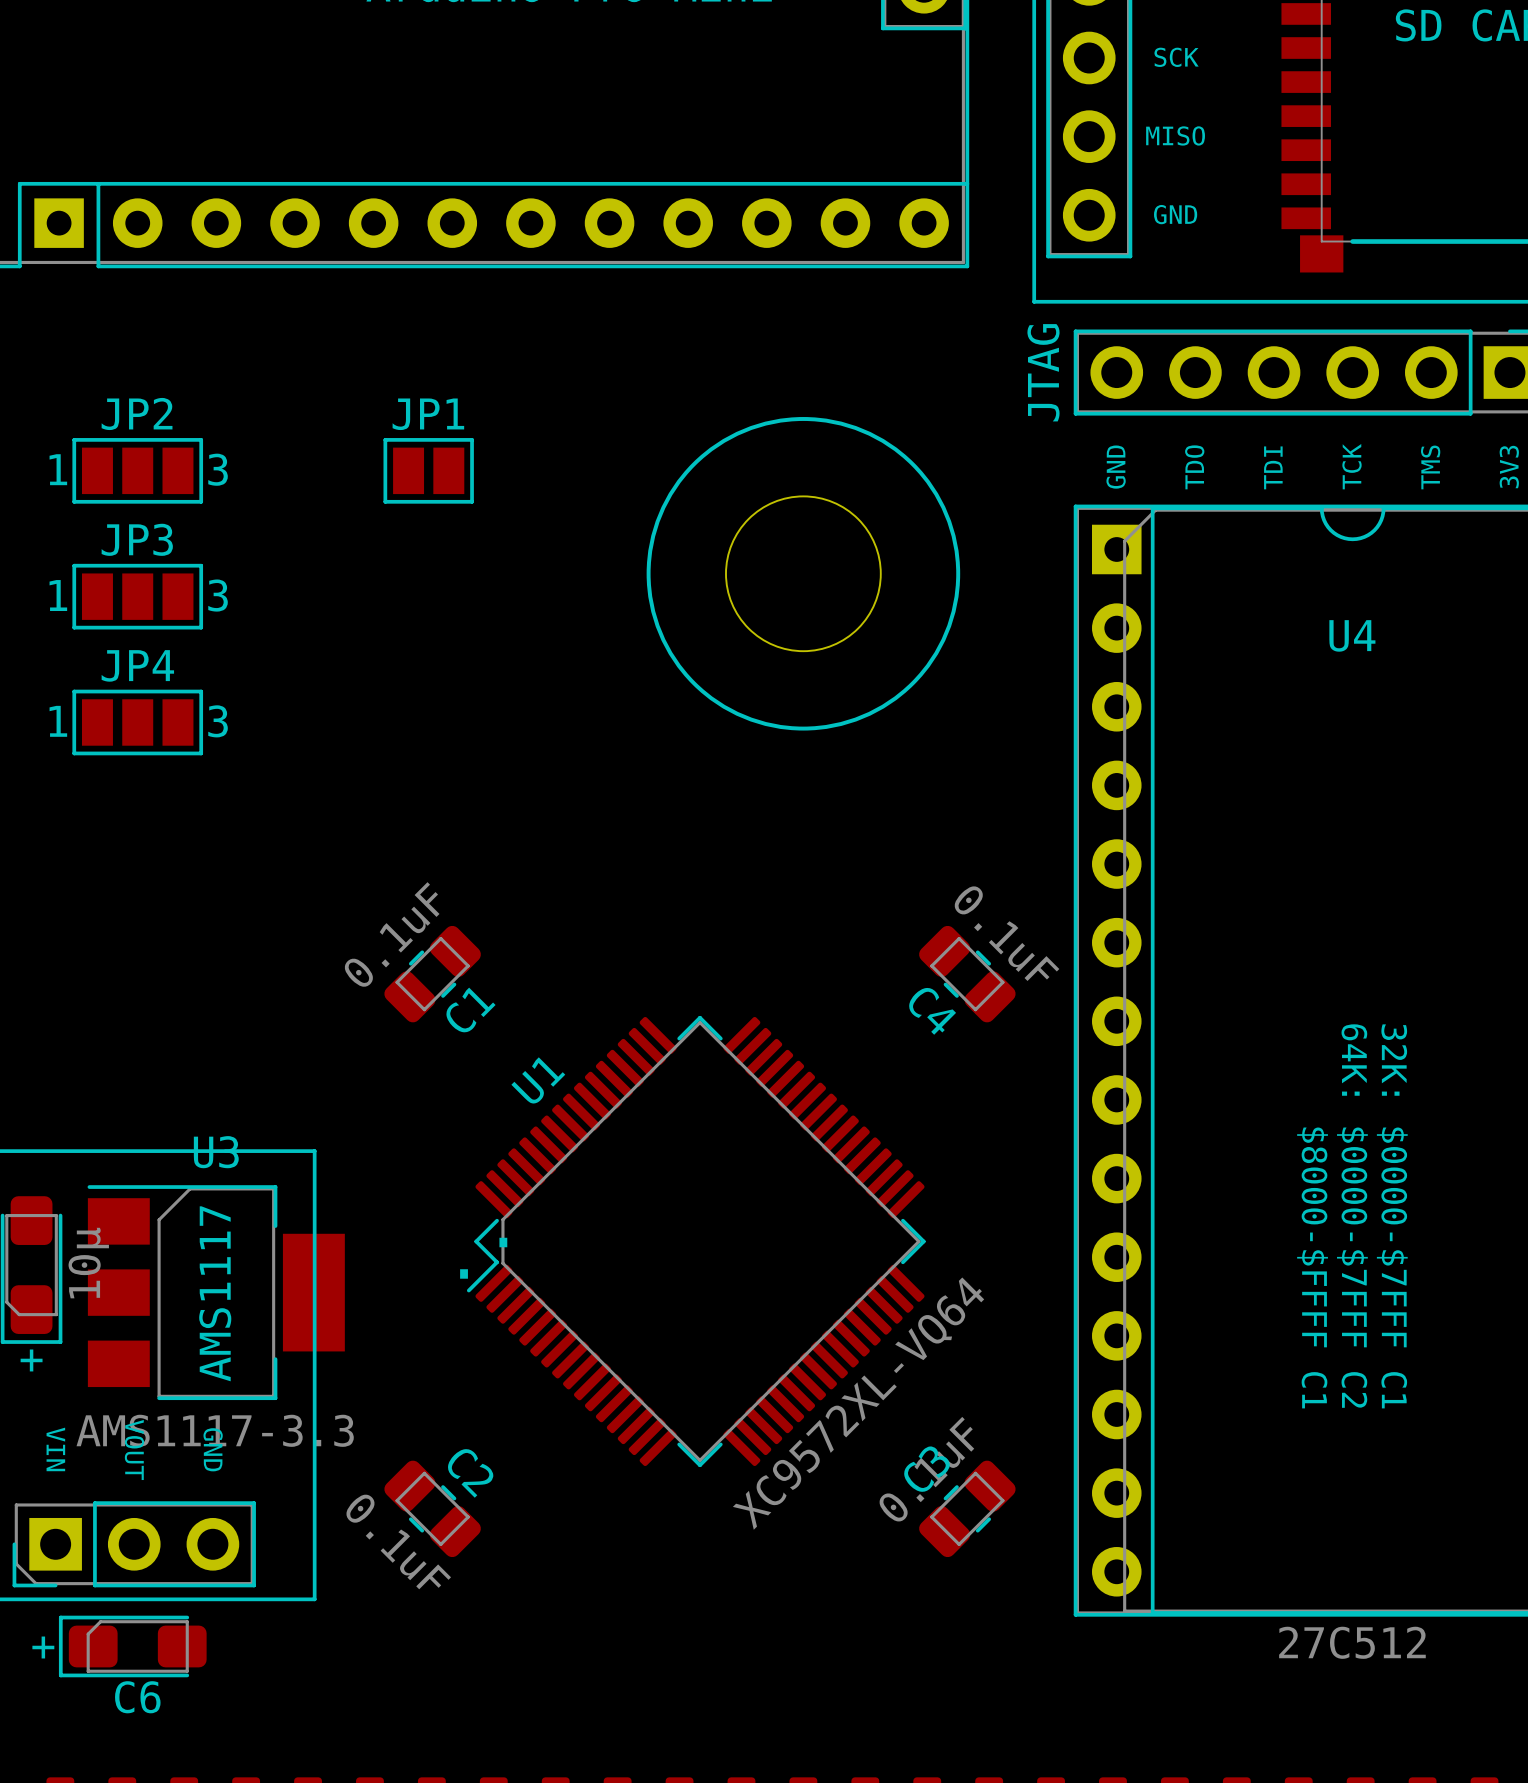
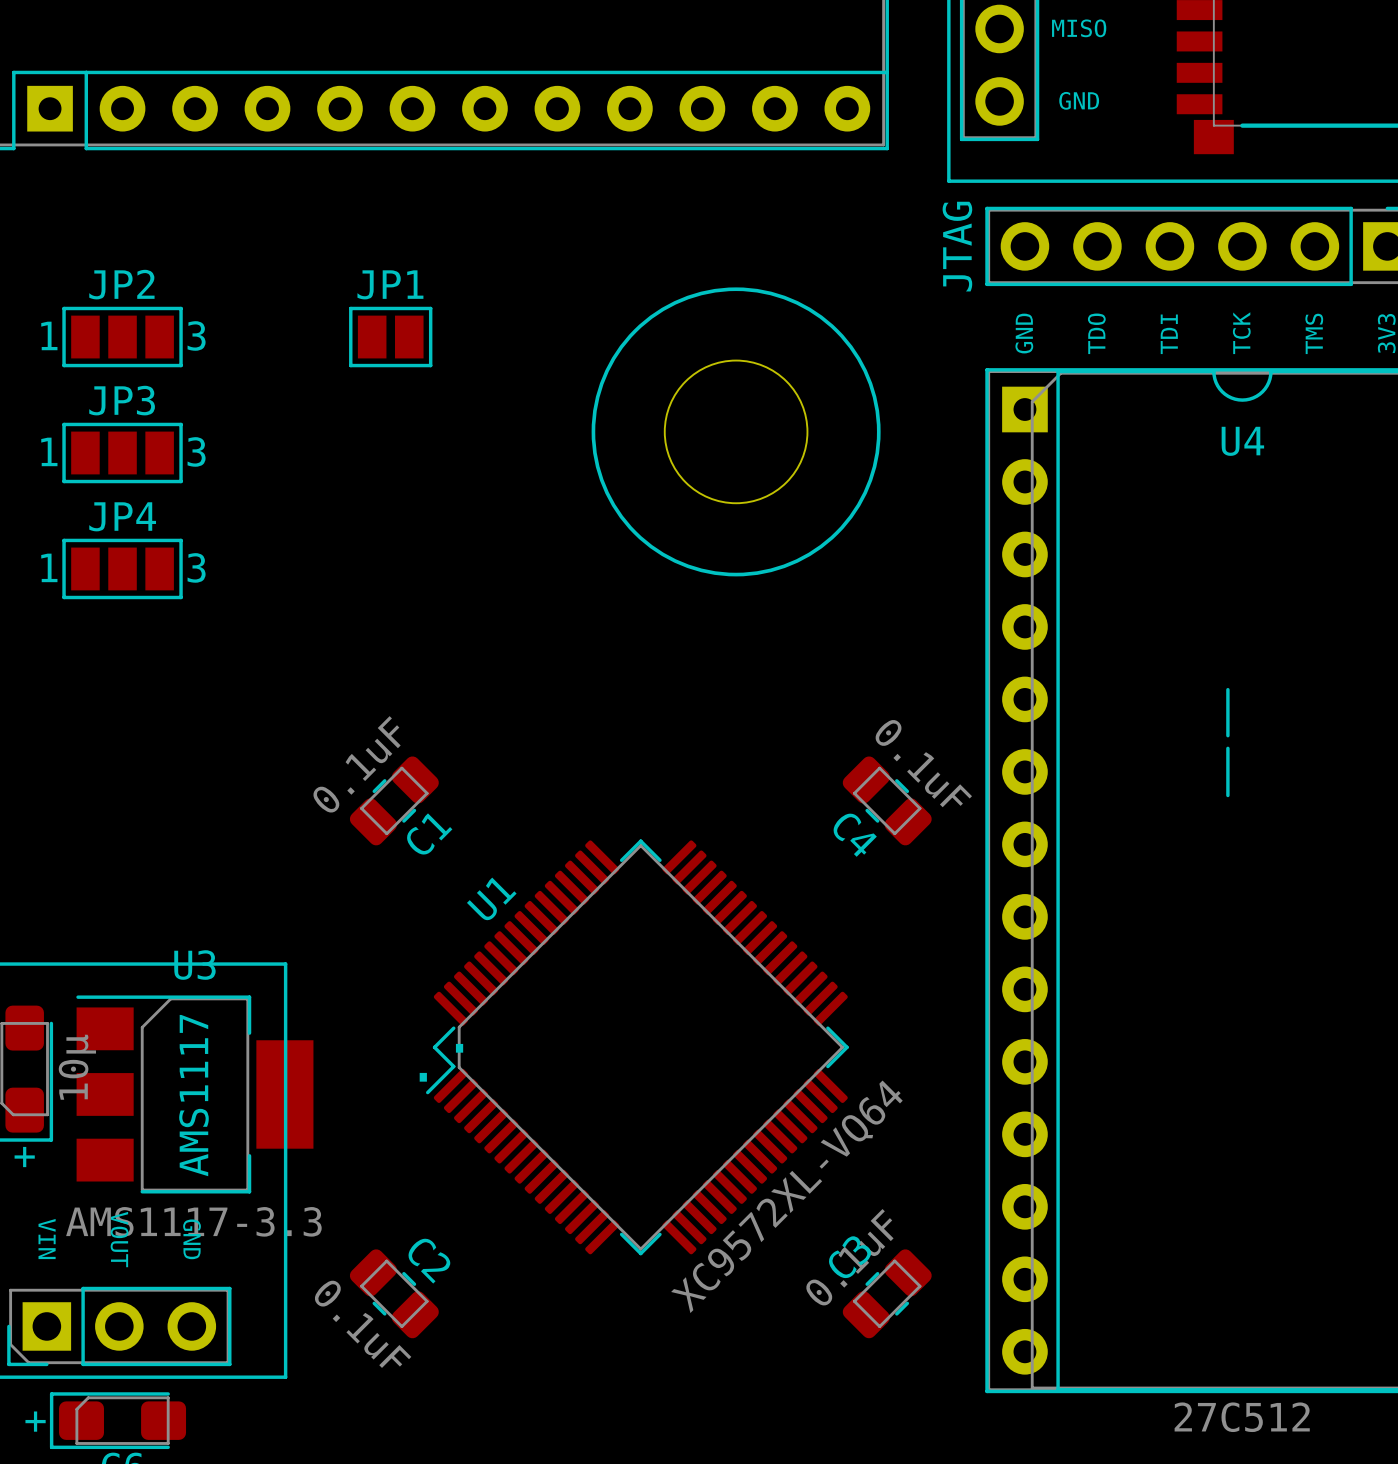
U4 name position: U4 (1352, 635) -> U4 (1242, 441)
line: none -> (1227, 689) (1227, 735)
line: none -> (1227, 748) (1227, 795)
text: 64K: $0000-$7FFF C2 (1352, 1216) -> none
text: 32K: $0000-$7FFF C1 (1392, 1216) -> none
text: $8000-$FFFF C1 (1312, 1267) -> none

